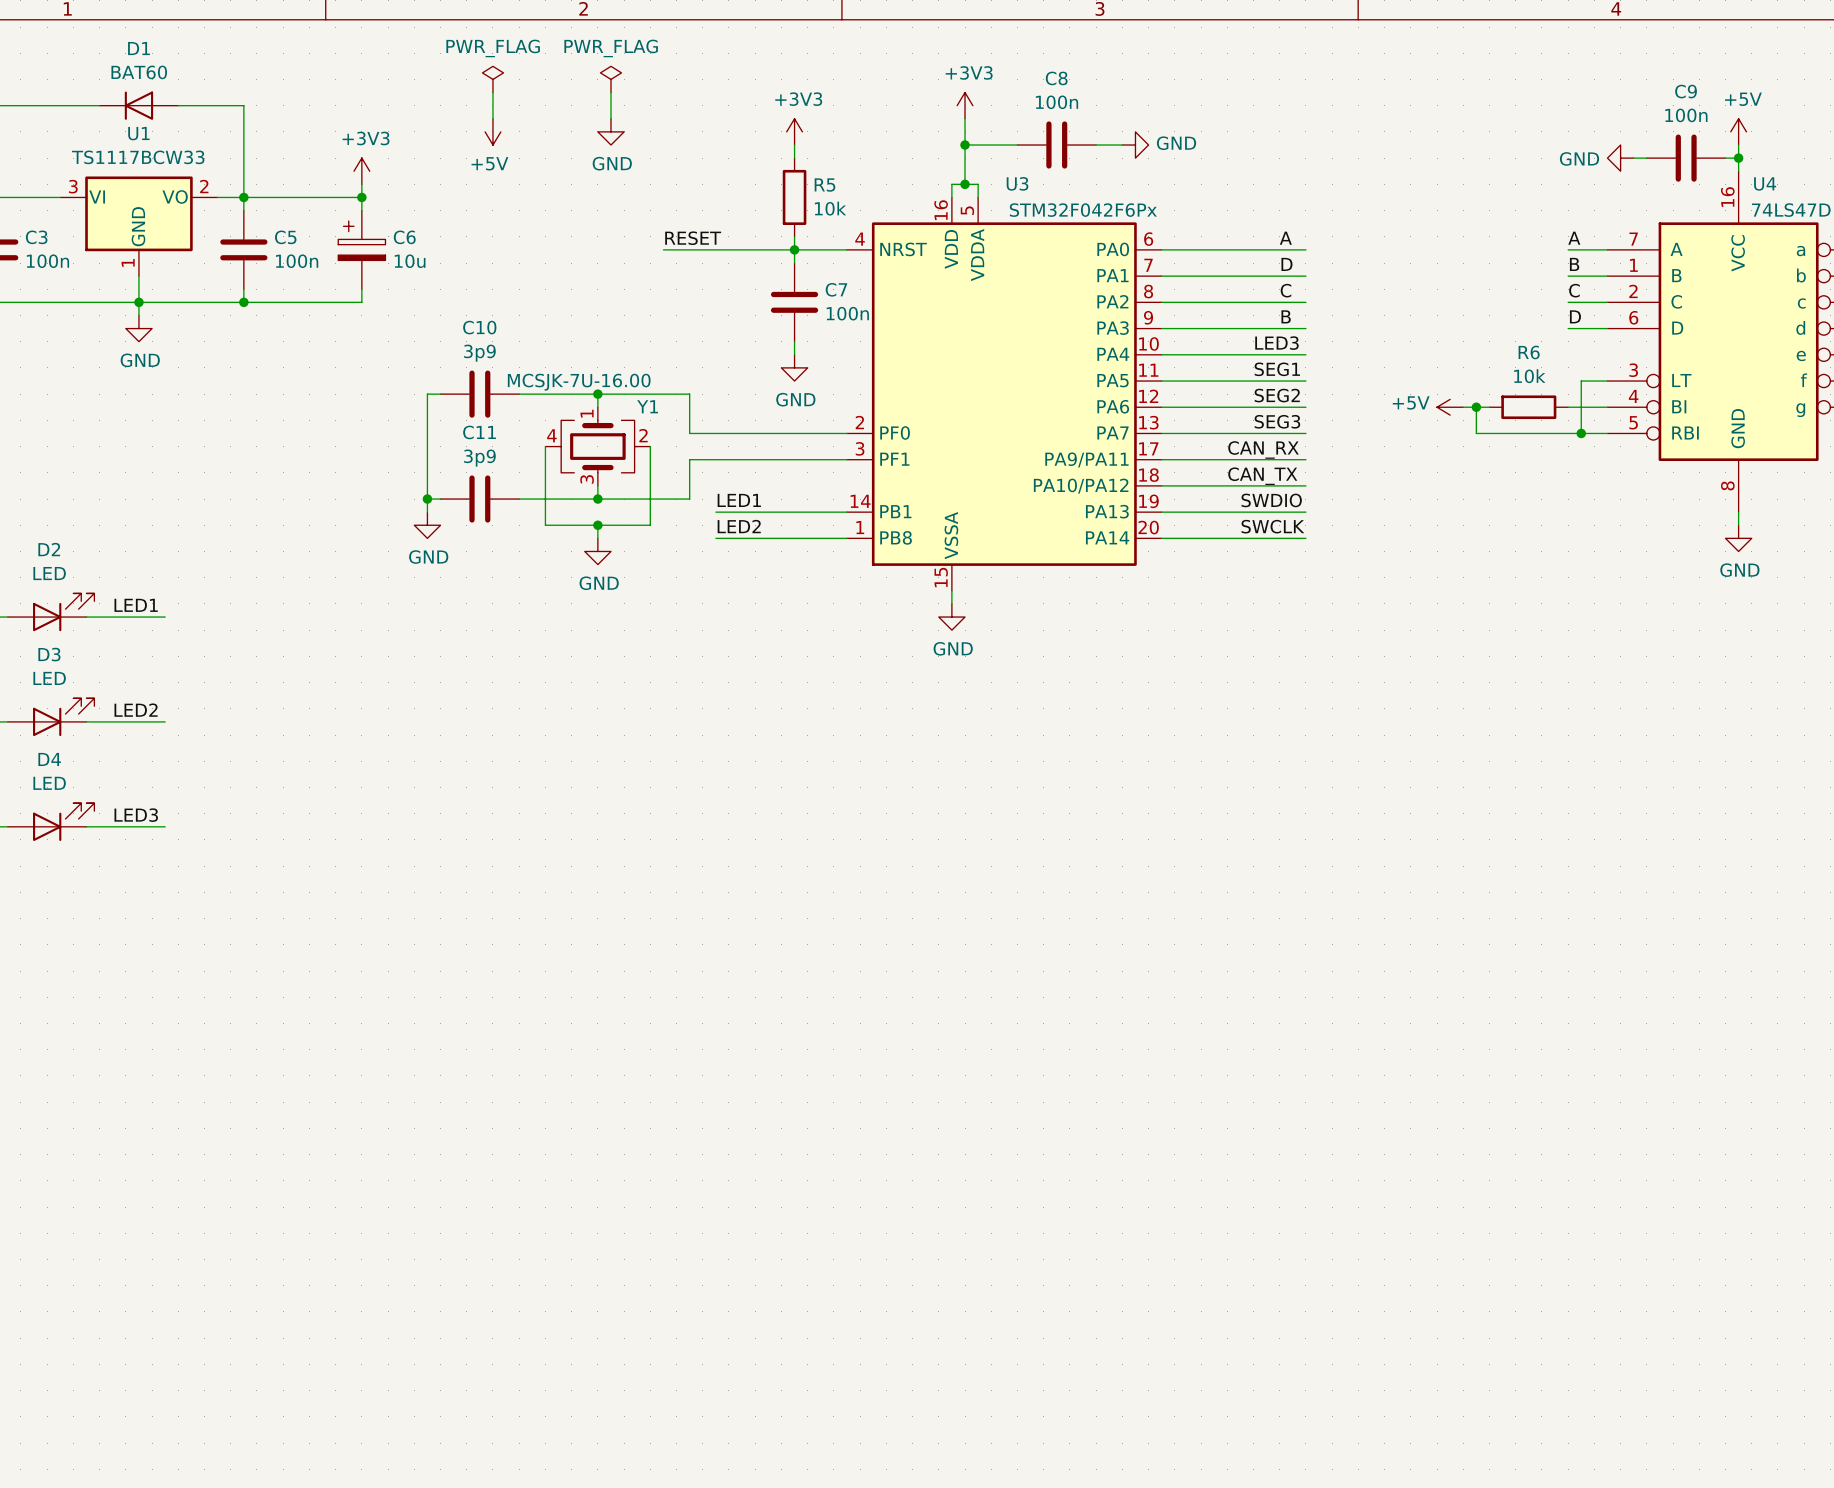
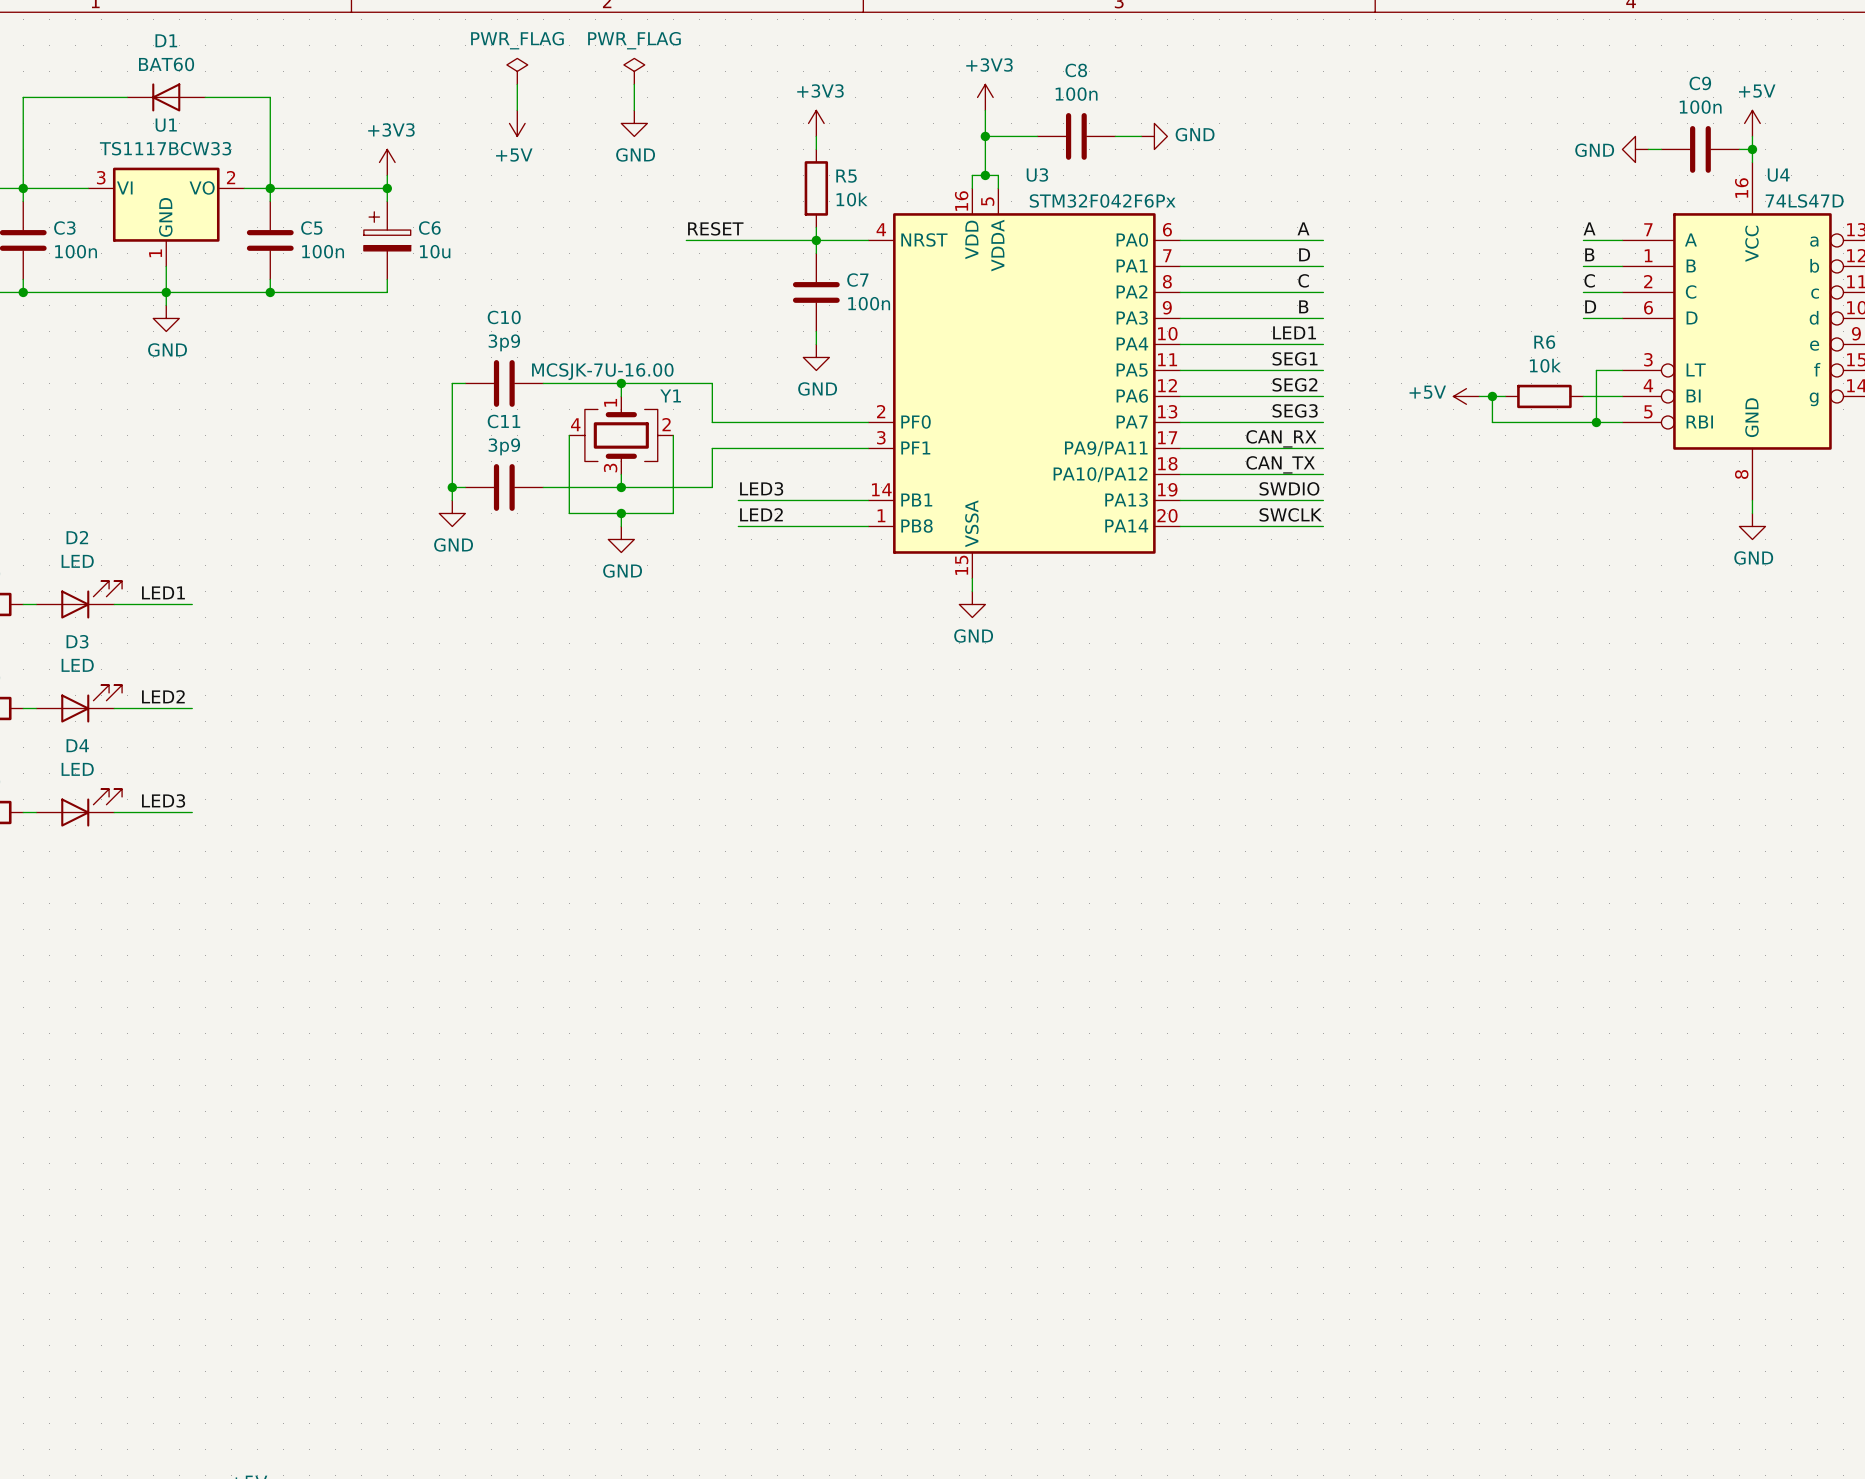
label: LED3 (1276, 343) -> LED1 (1294, 332)
label: LED1 (739, 500) -> LED3 (761, 488)

